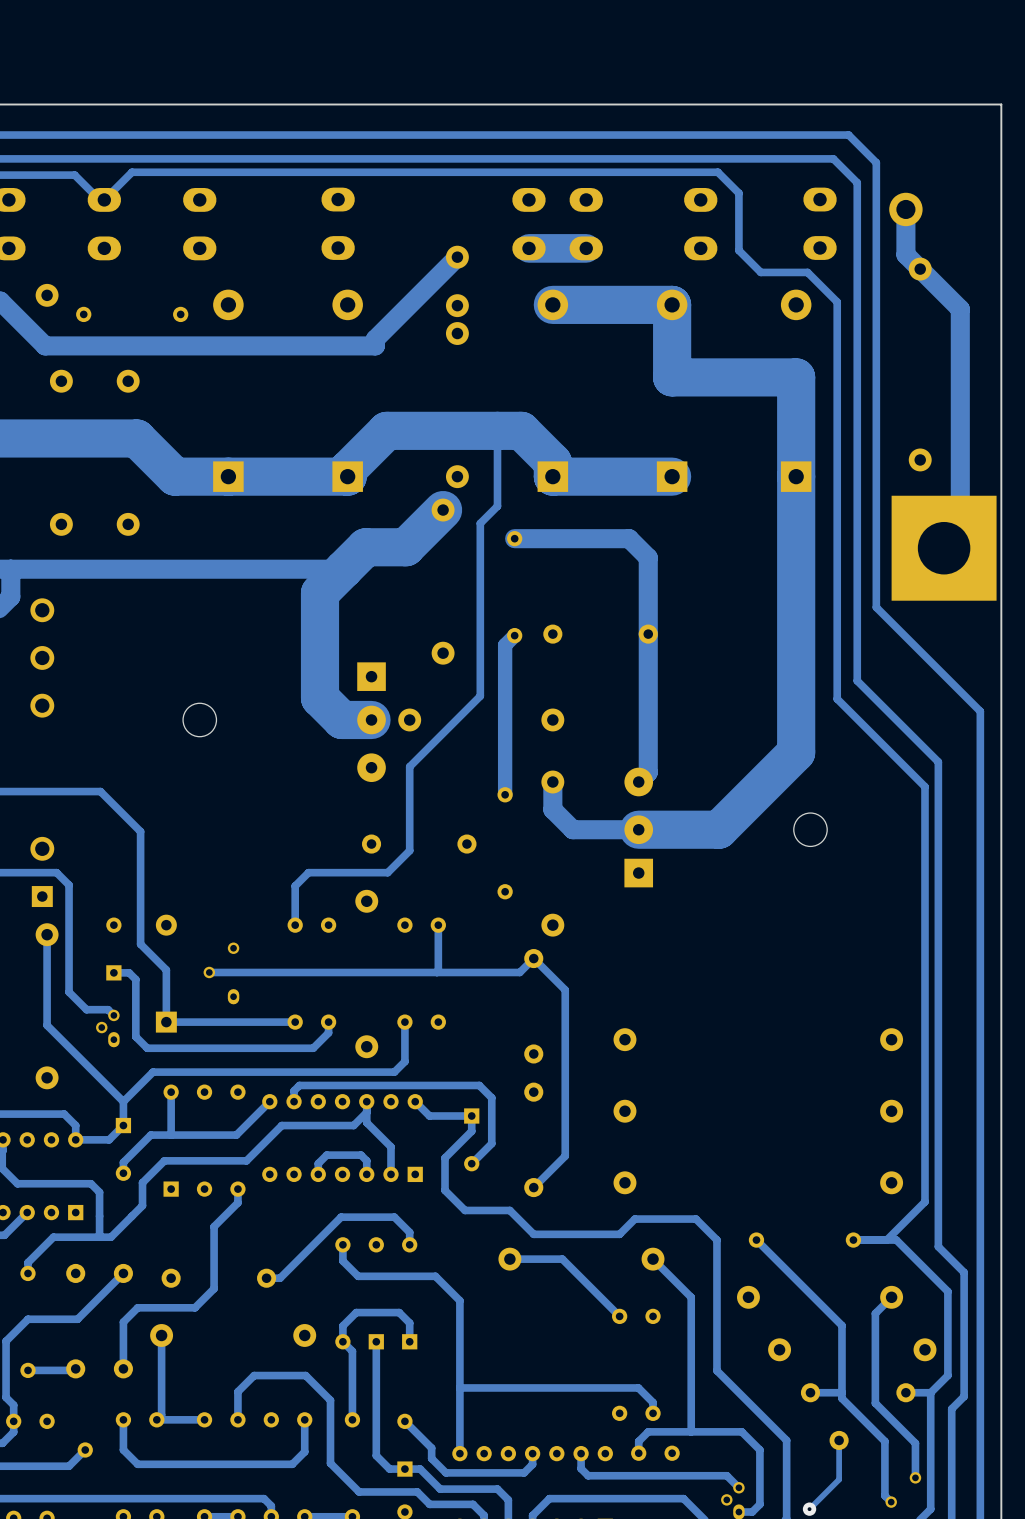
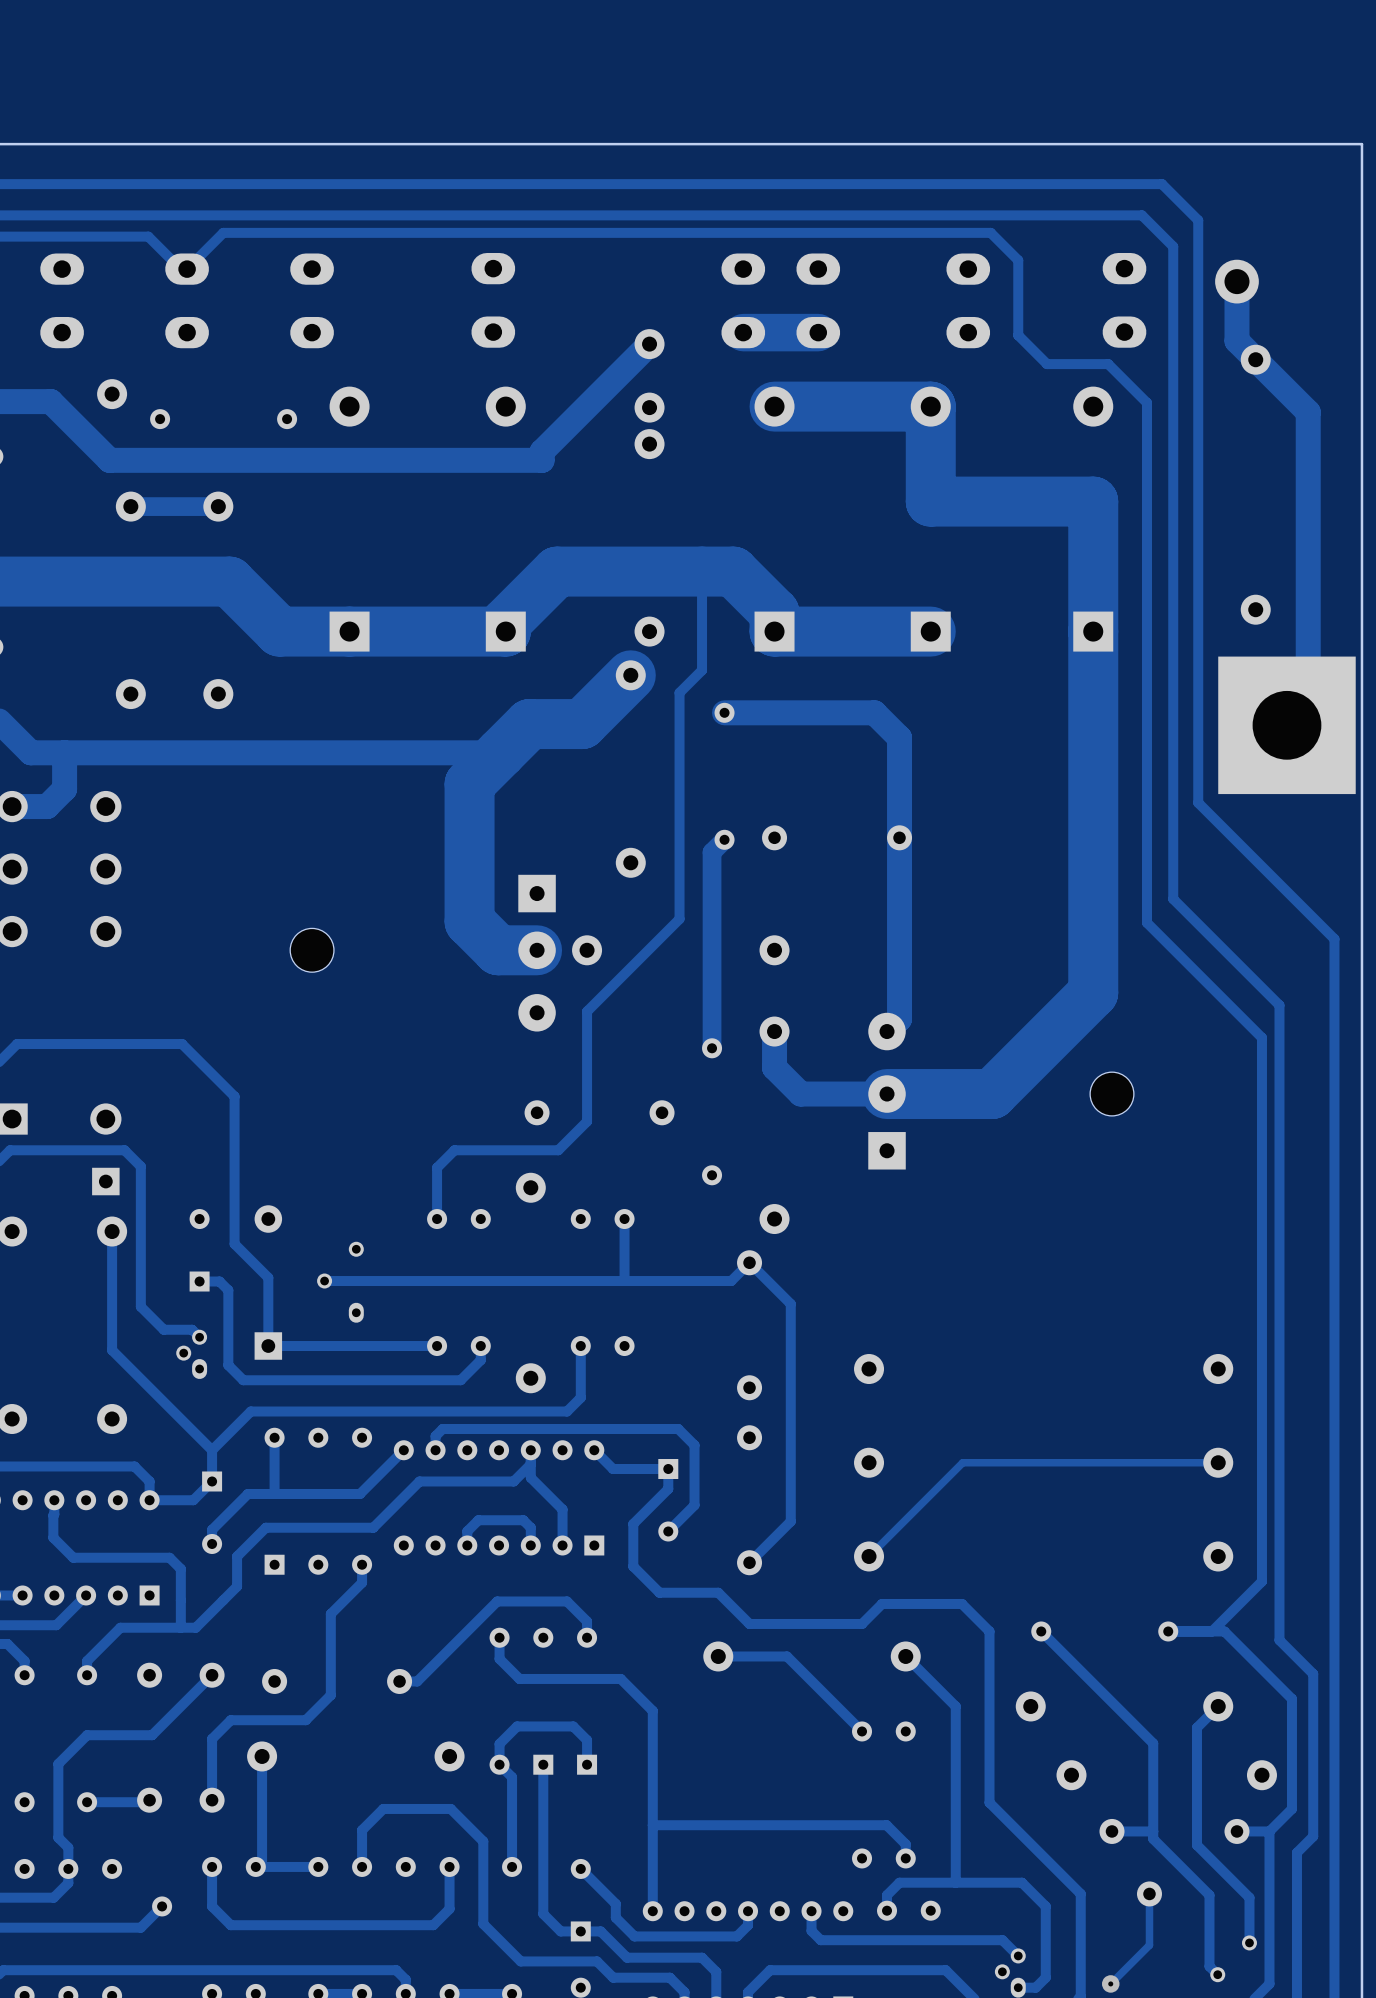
track: none -> (218, 506) (130, 506)
track: none -> (1218, 1462) (962, 1462) (869, 1556)

